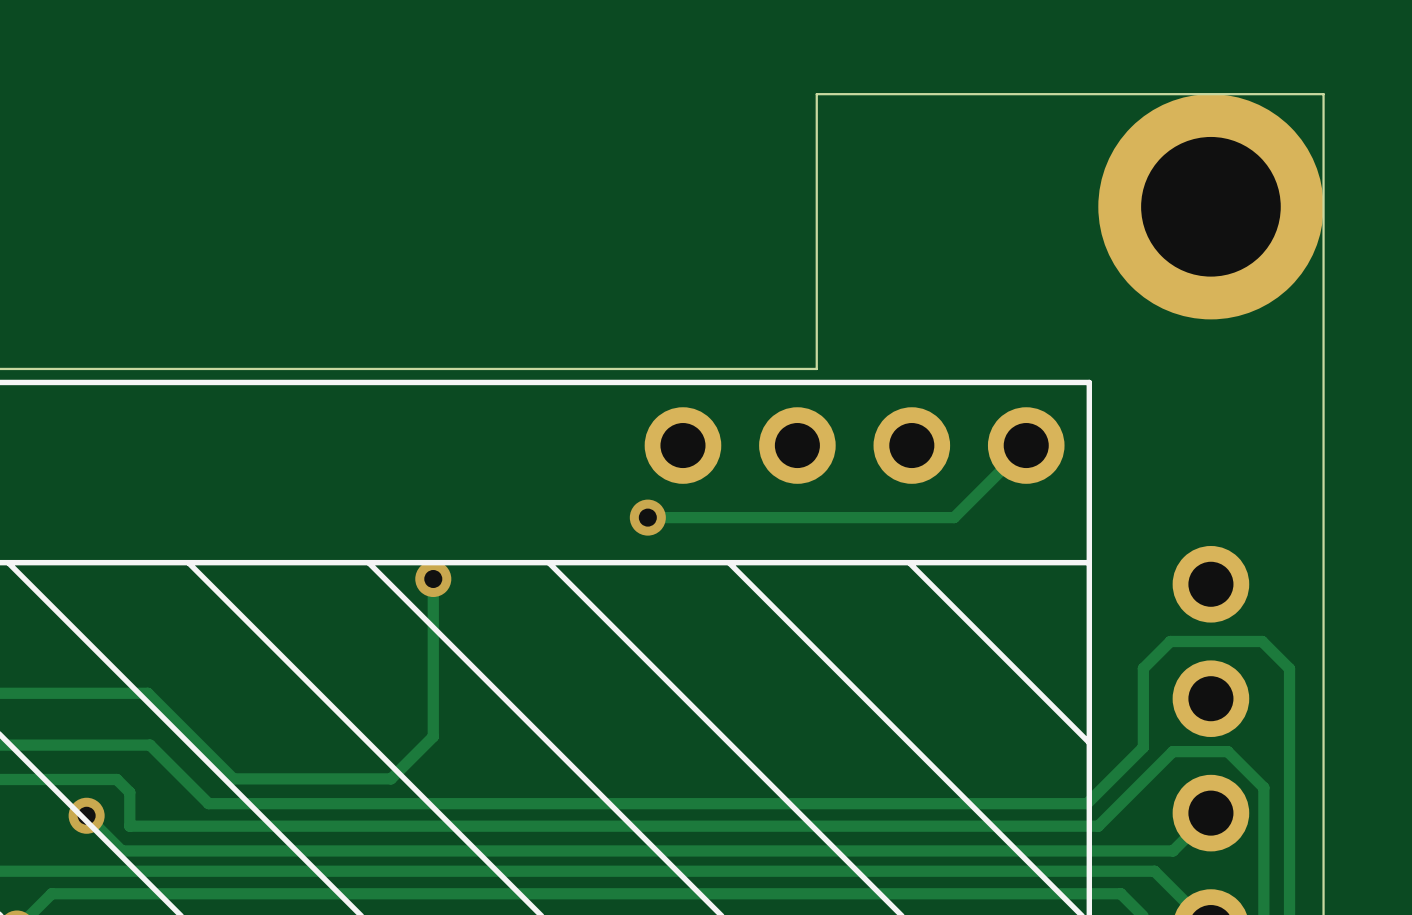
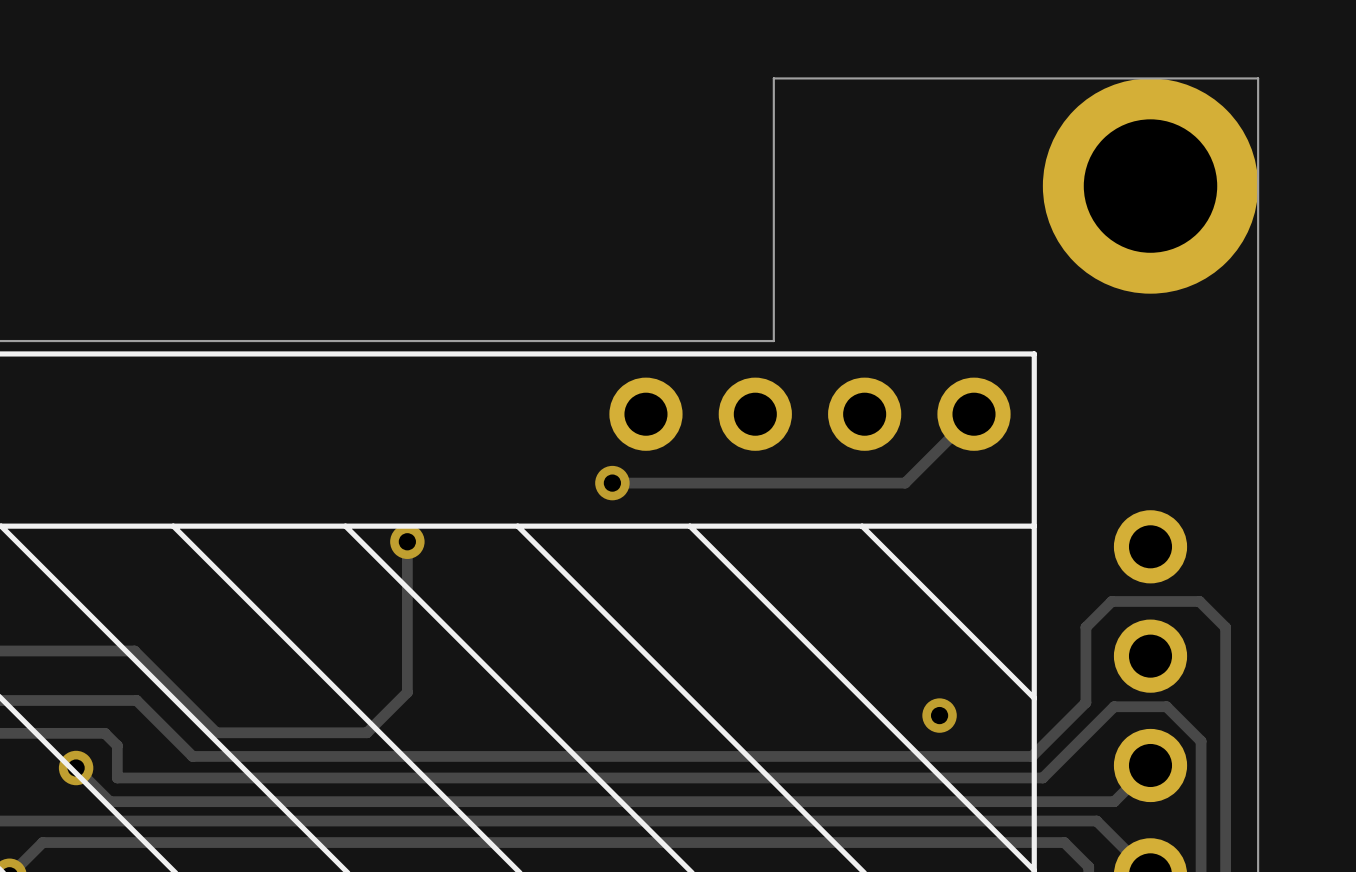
via: none -> (939, 715)

